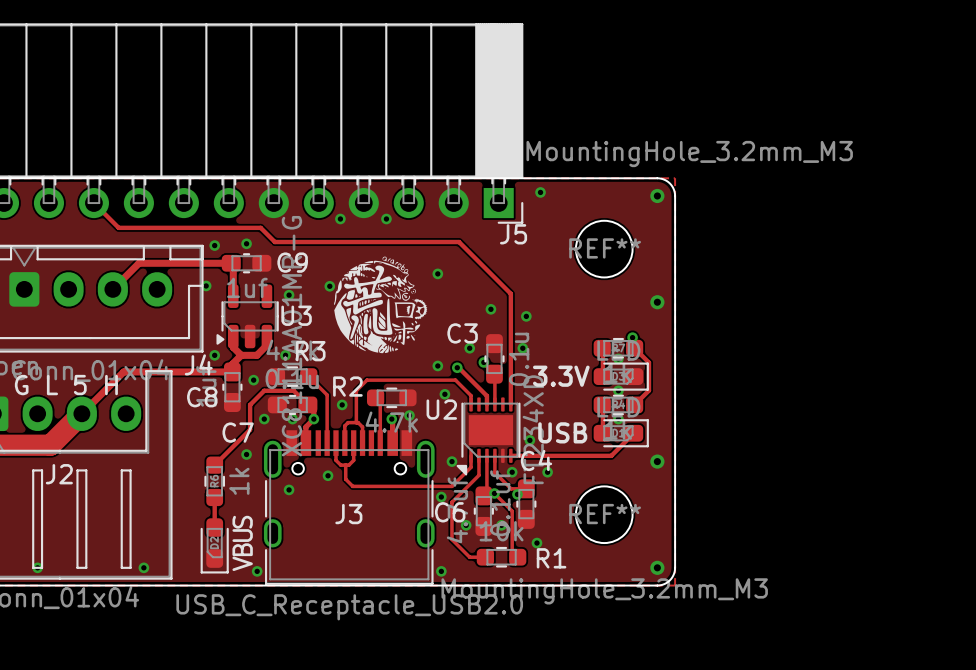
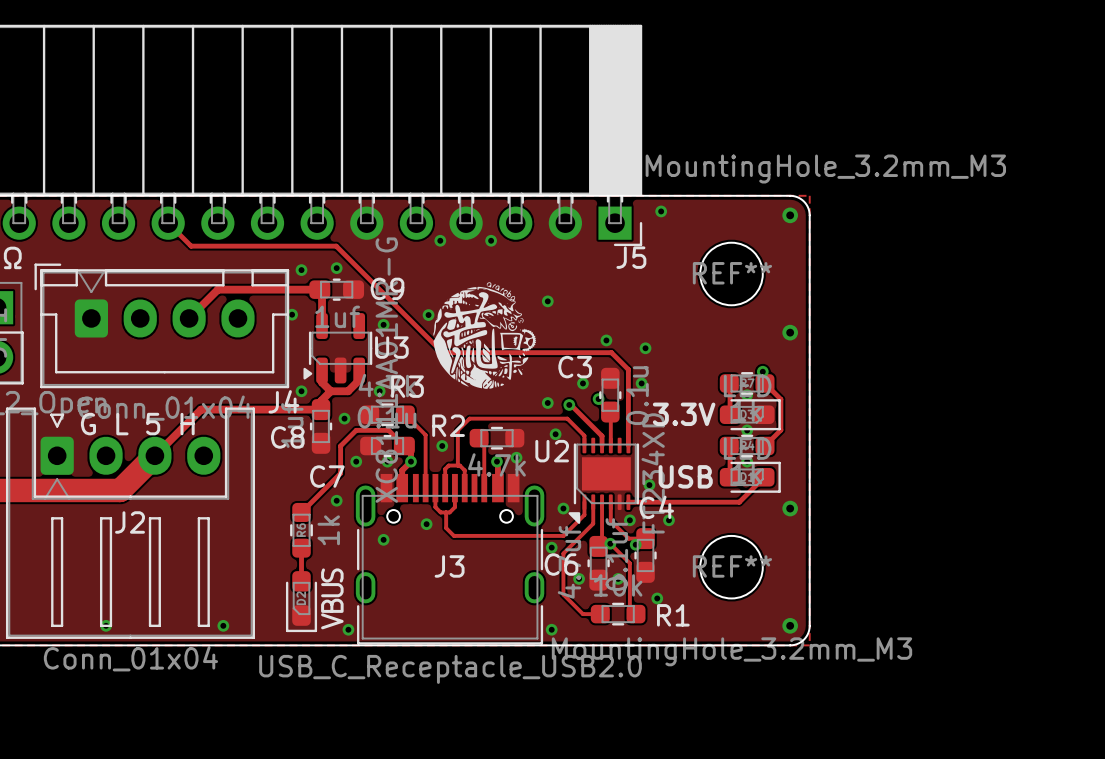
track: (114, 223) (118, 227) (260, 227) (274, 242) (459, 242) (510, 293) (510, 335) -> (191, 246) (336, 246) (442, 352) (611, 352) (628, 369)

